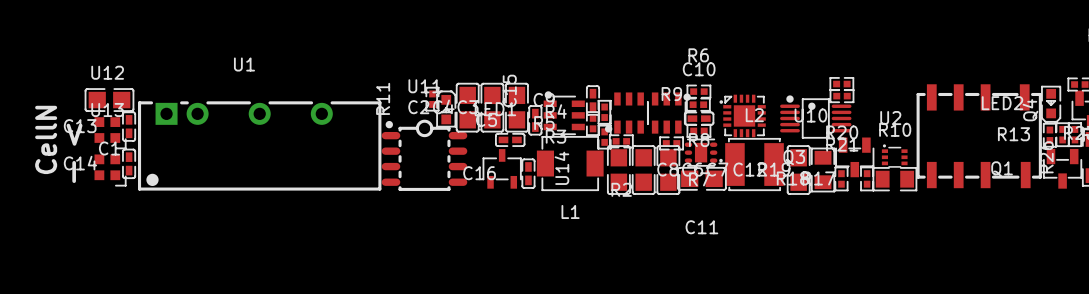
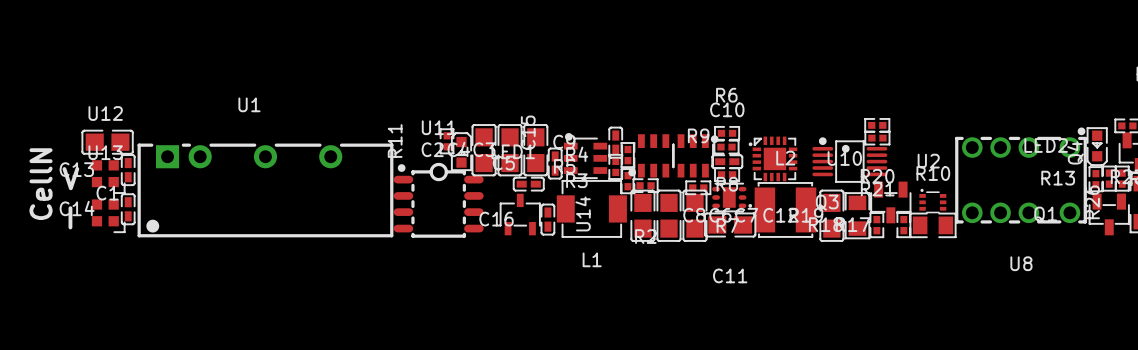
U8: none -> (1021, 175)
part: (979, 136) -> none

